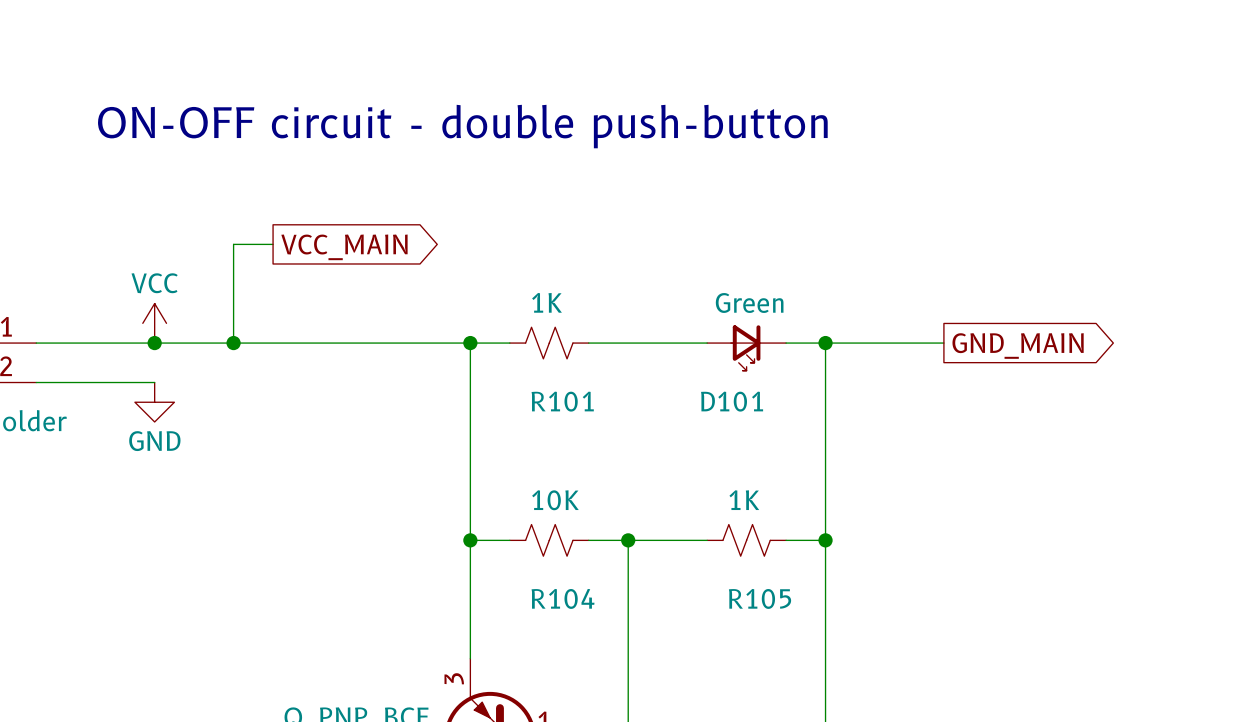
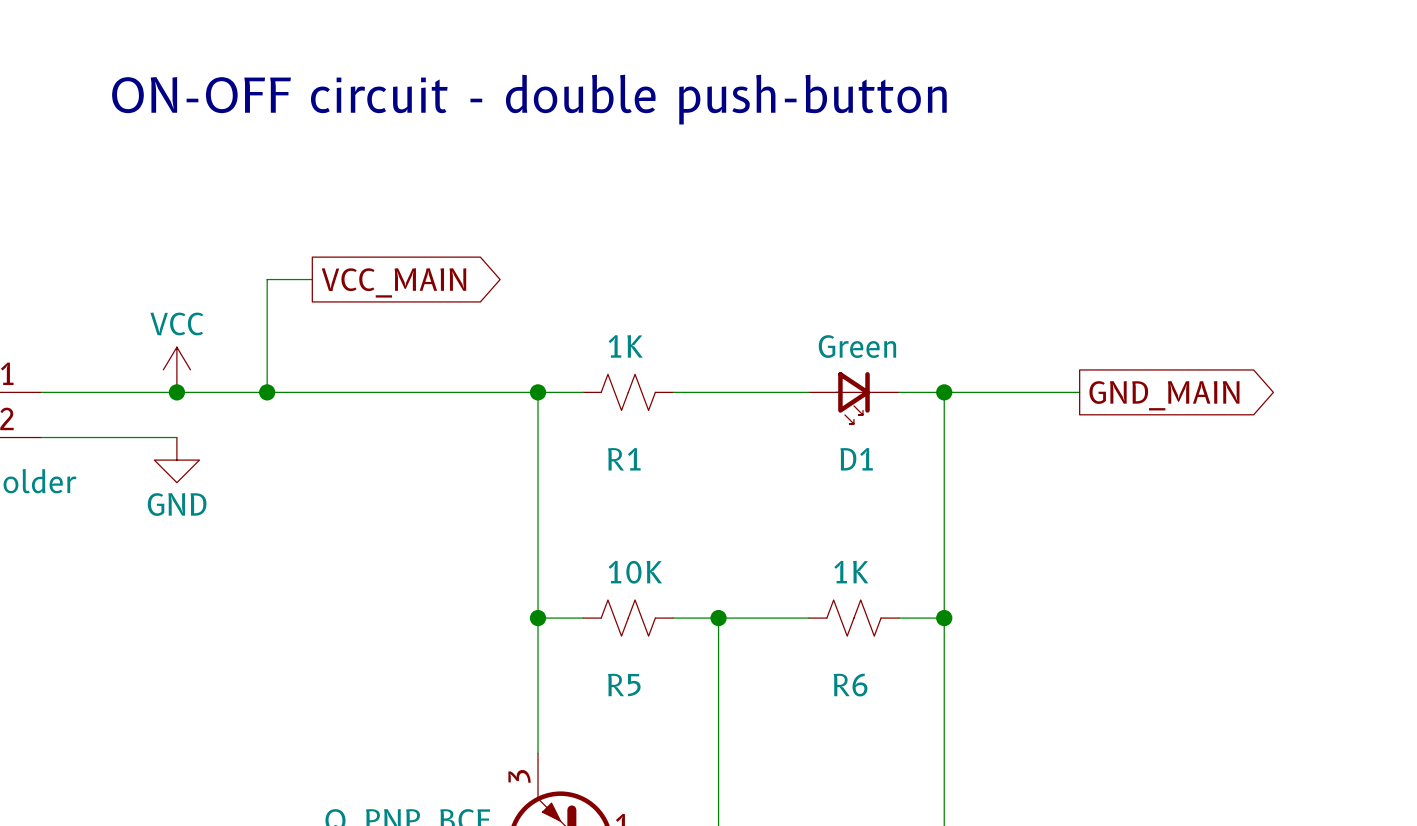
text position: ON-OFF circuit - double push-button (462, 126) -> ON-OFF circuit - double push-button (529, 99)
R101 name: R101 (562, 401) -> R1 (624, 459)
D101 name: D101 (732, 401) -> D1 (856, 459)
R104 name: R104 (563, 598) -> R5 (624, 684)
R105 name: R105 (760, 598) -> R6 (850, 685)

